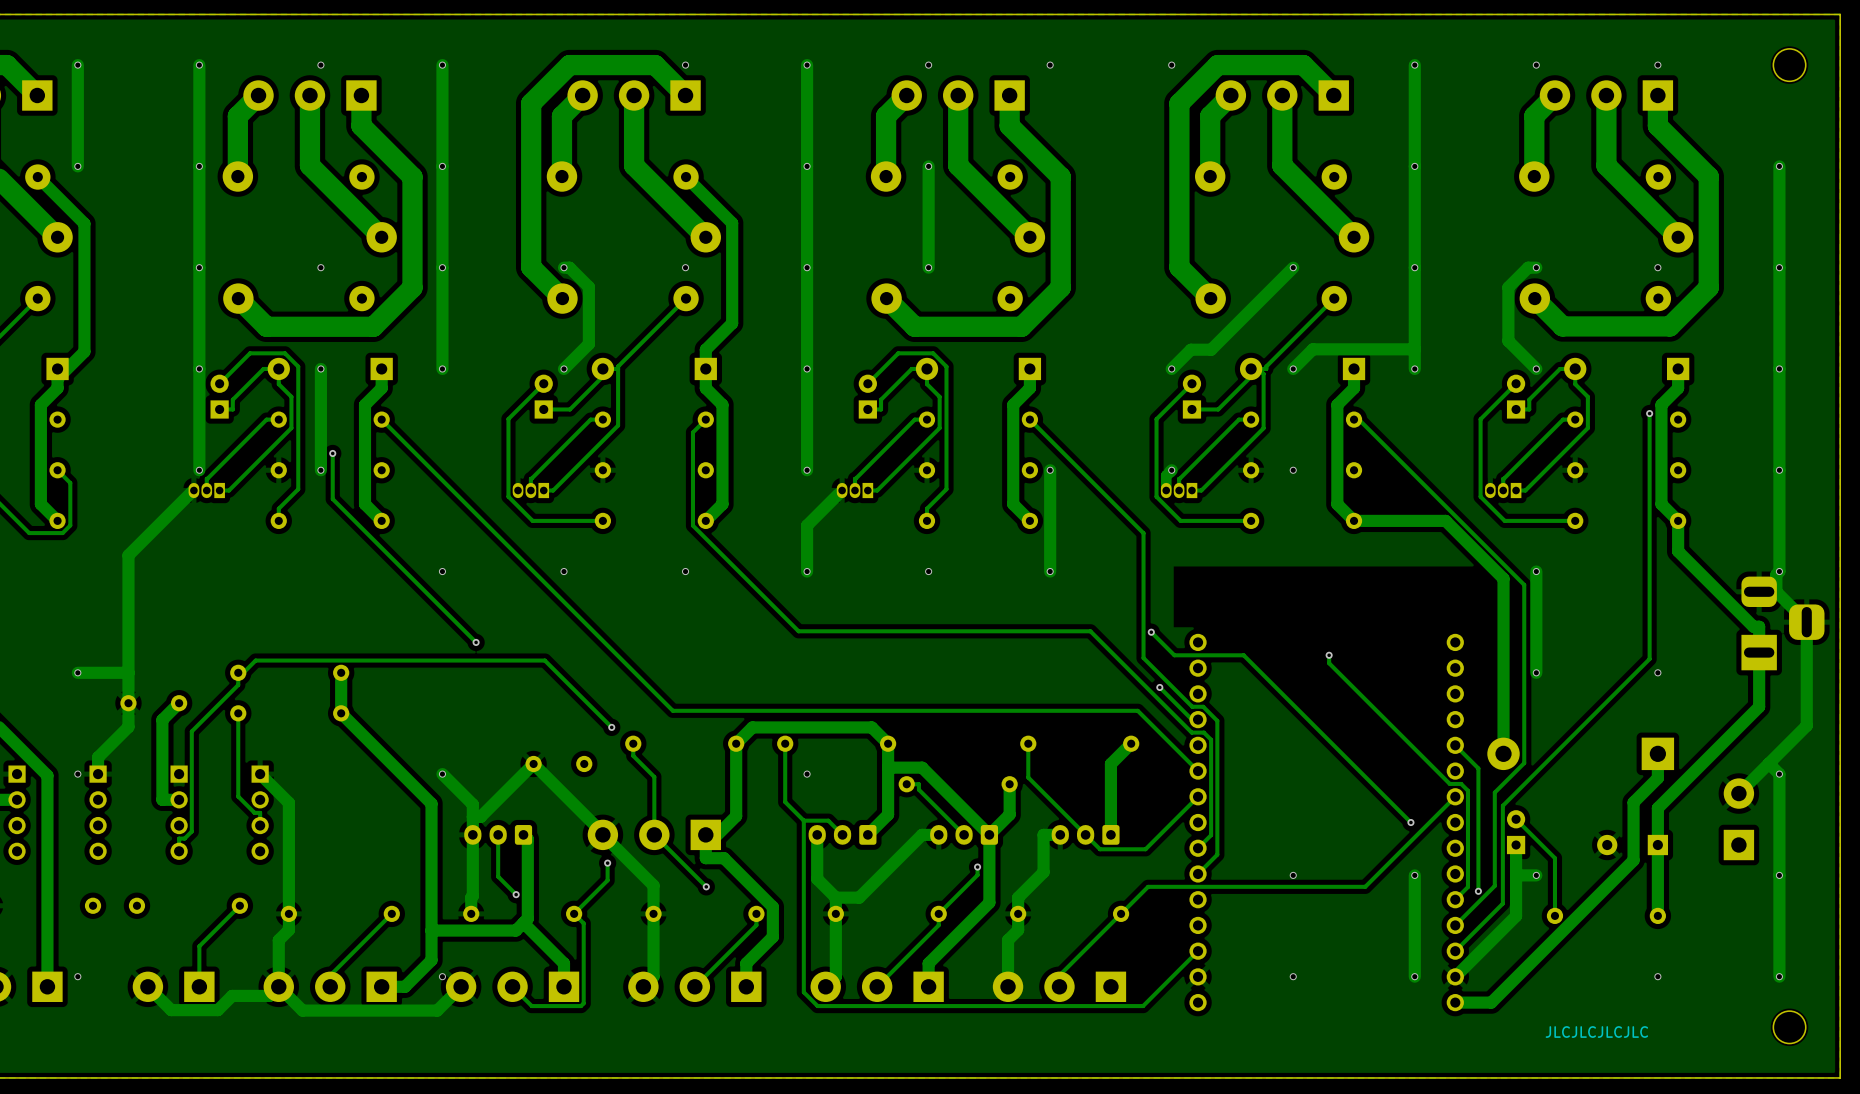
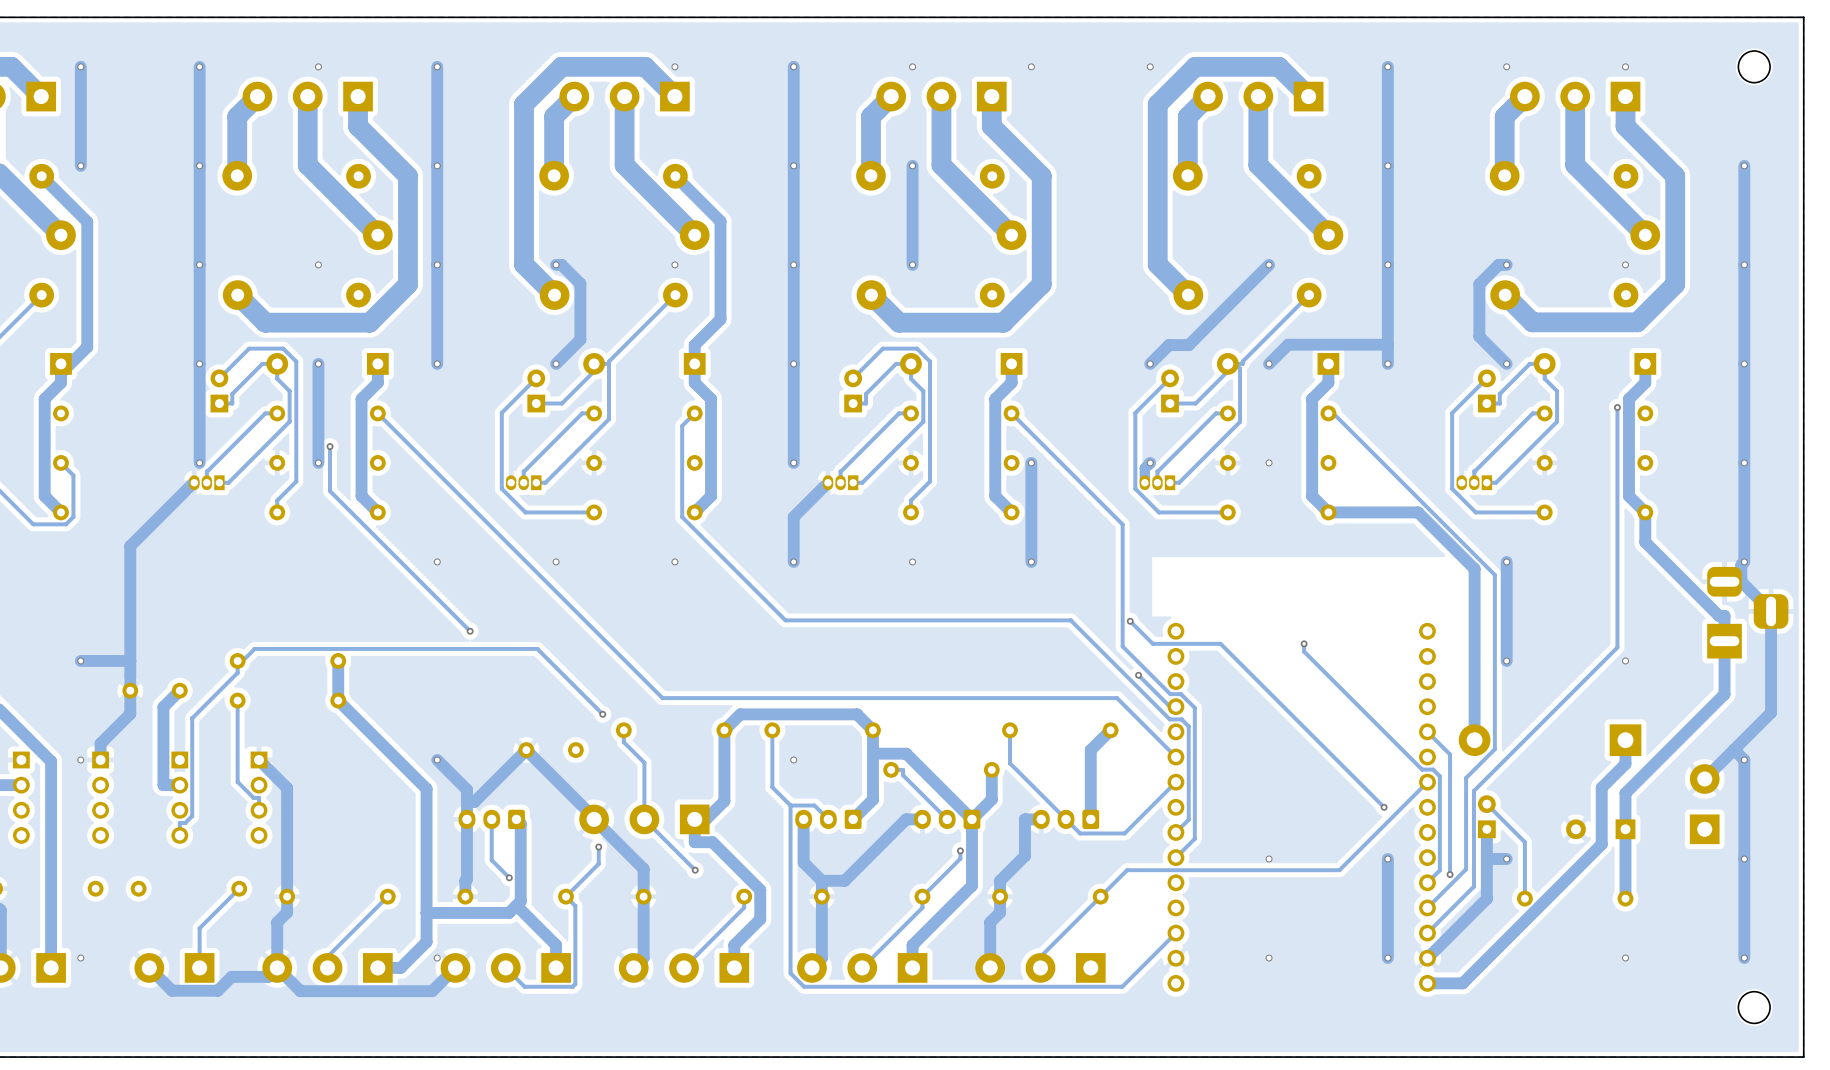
text: JLCJLCJLCJLC (1596, 1032) -> none

